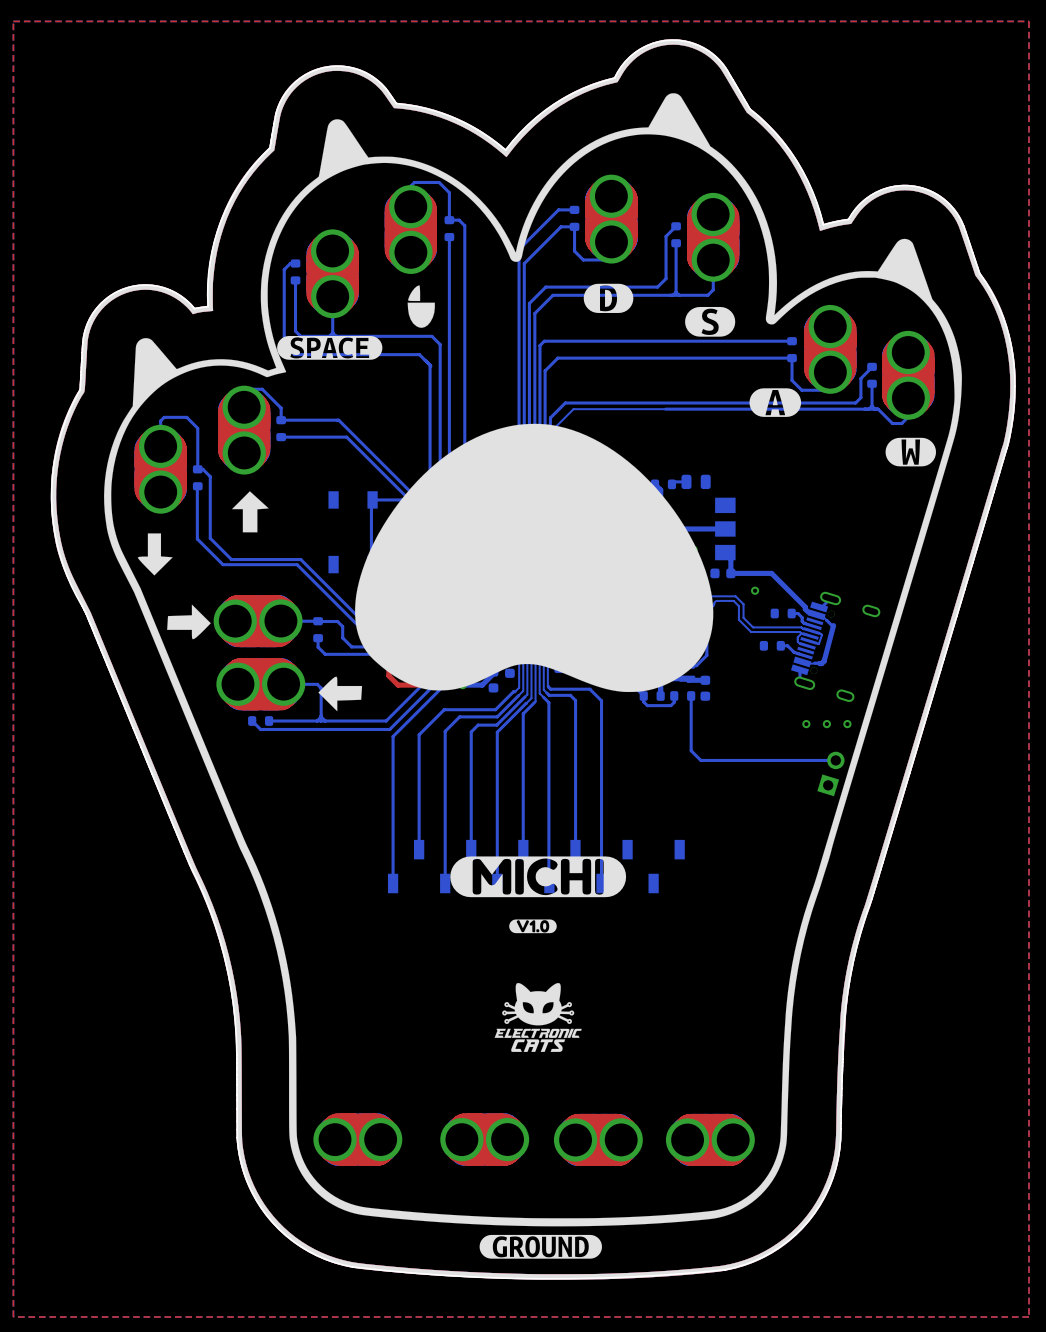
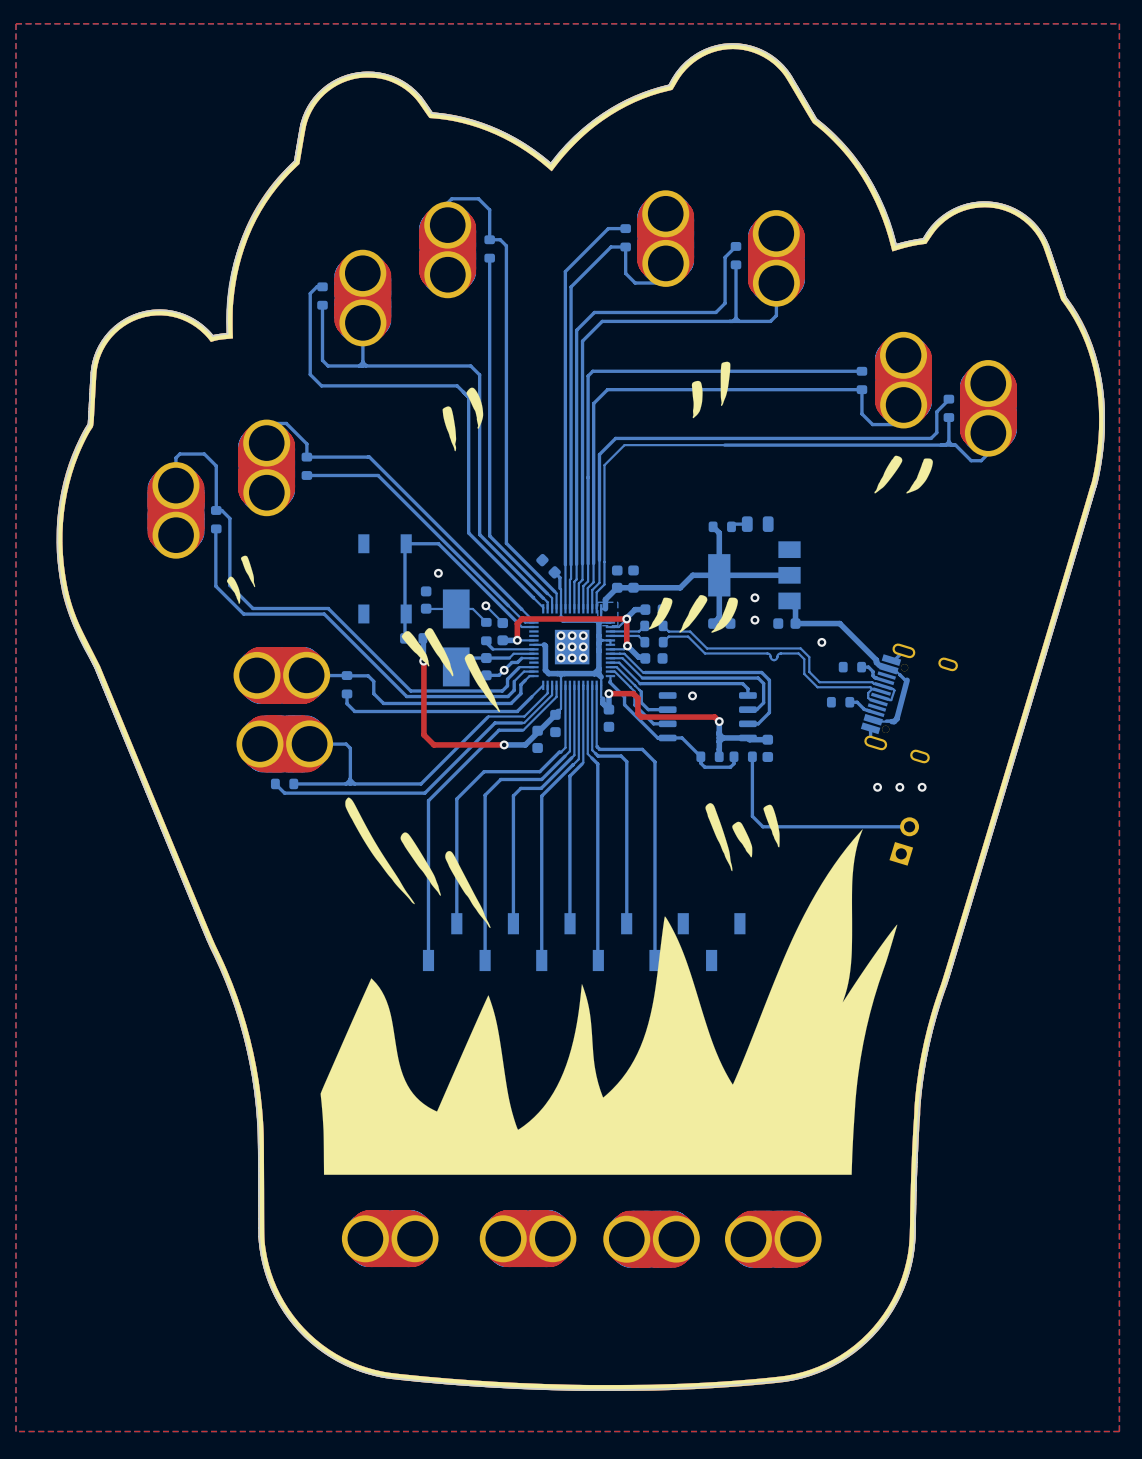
drawing shape: [50, 39, 1016, 1280] -> [56, 43, 1105, 1391]
drawing: [583, 283, 634, 313] -> none
drawing: [407, 285, 435, 328] -> none
drawing: [685, 306, 736, 337] -> none
drawing: [277, 336, 383, 360] -> none
drawing: [749, 388, 802, 417] -> none
drawing: [885, 437, 937, 467] -> none
drawing: [232, 491, 269, 533] -> none
drawing: [137, 533, 173, 576] -> none
drawing: [167, 604, 211, 640] -> none
drawing: [318, 676, 363, 712] -> none
drawing: [450, 856, 627, 898] -> none
drawing: [509, 919, 557, 934] -> none
drawing: [494, 983, 582, 1052] -> none
drawing: [479, 1234, 603, 1259] -> none

